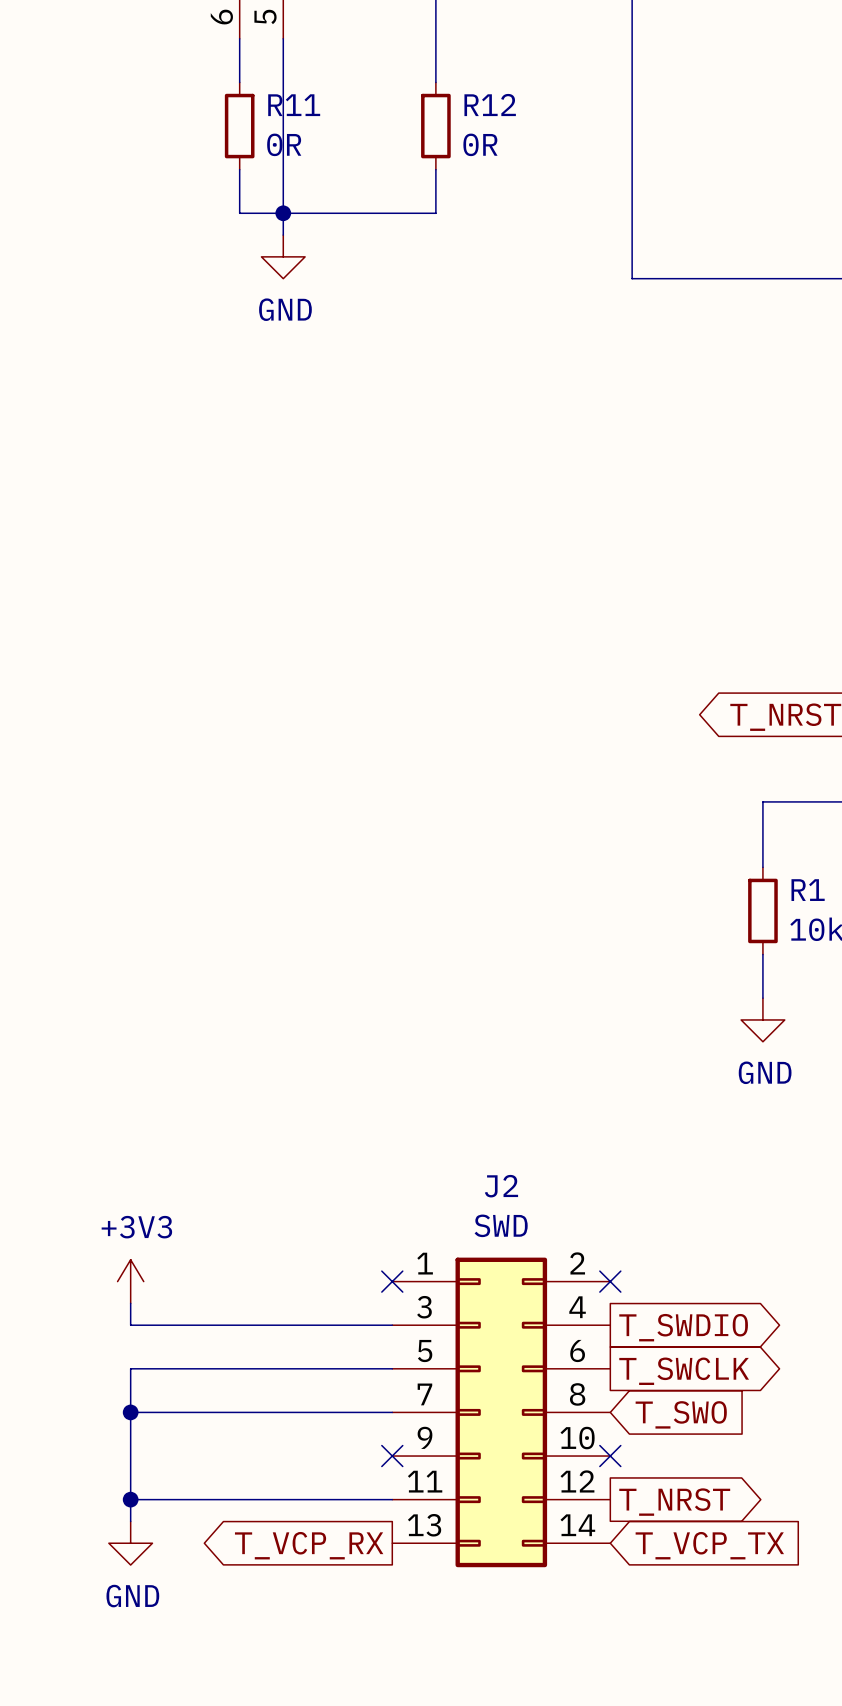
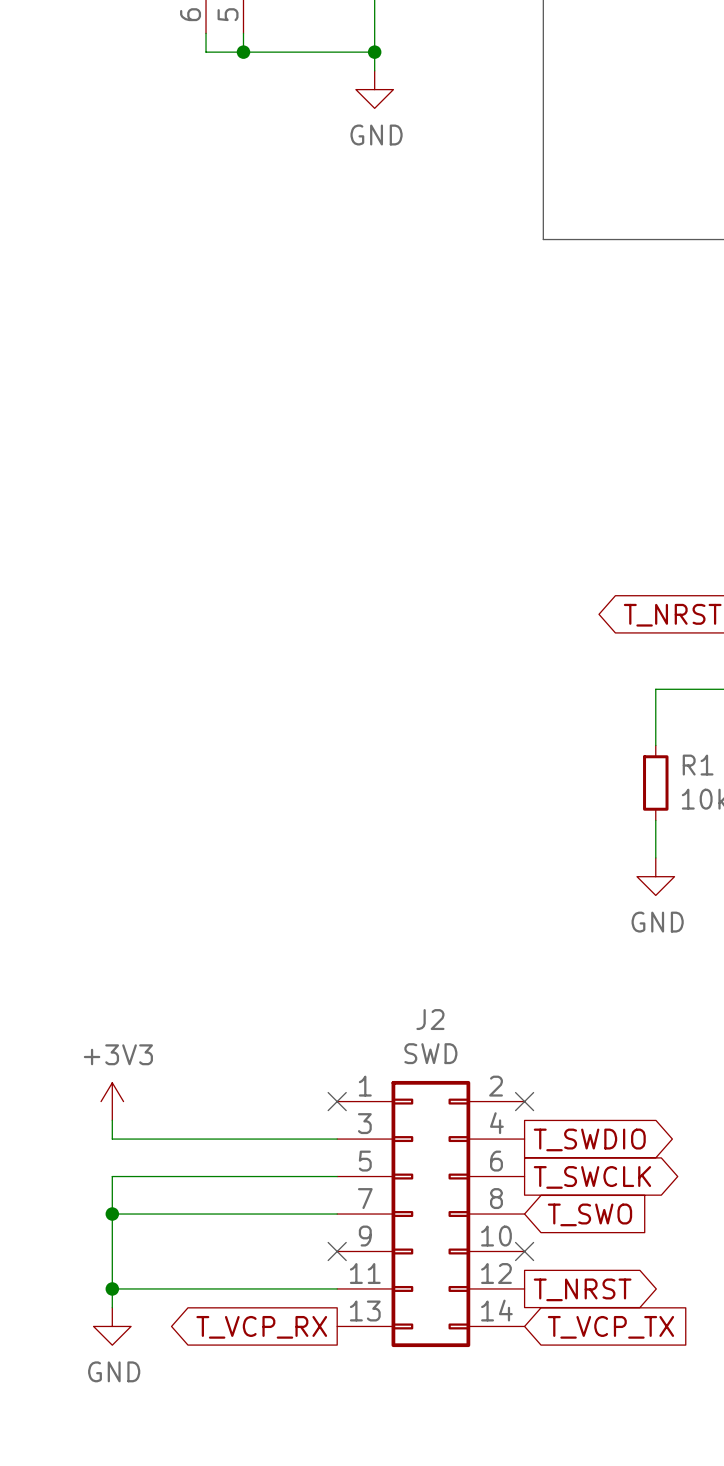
wire: (239, 60) (239, 82) -> (206, 52) (374, 52)
wire: (283, 60) (283, 235) -> none
junction: none -> (243, 52)
junction: none -> (374, 52)
R11: 0R (239, 126) -> none
R12: 0R (435, 126) -> none
wire: (239, 169) (239, 213) (435, 213) (435, 169) -> none
junction: (283, 213) -> none
power symbol position: GND (283, 256) -> GND (374, 89)

